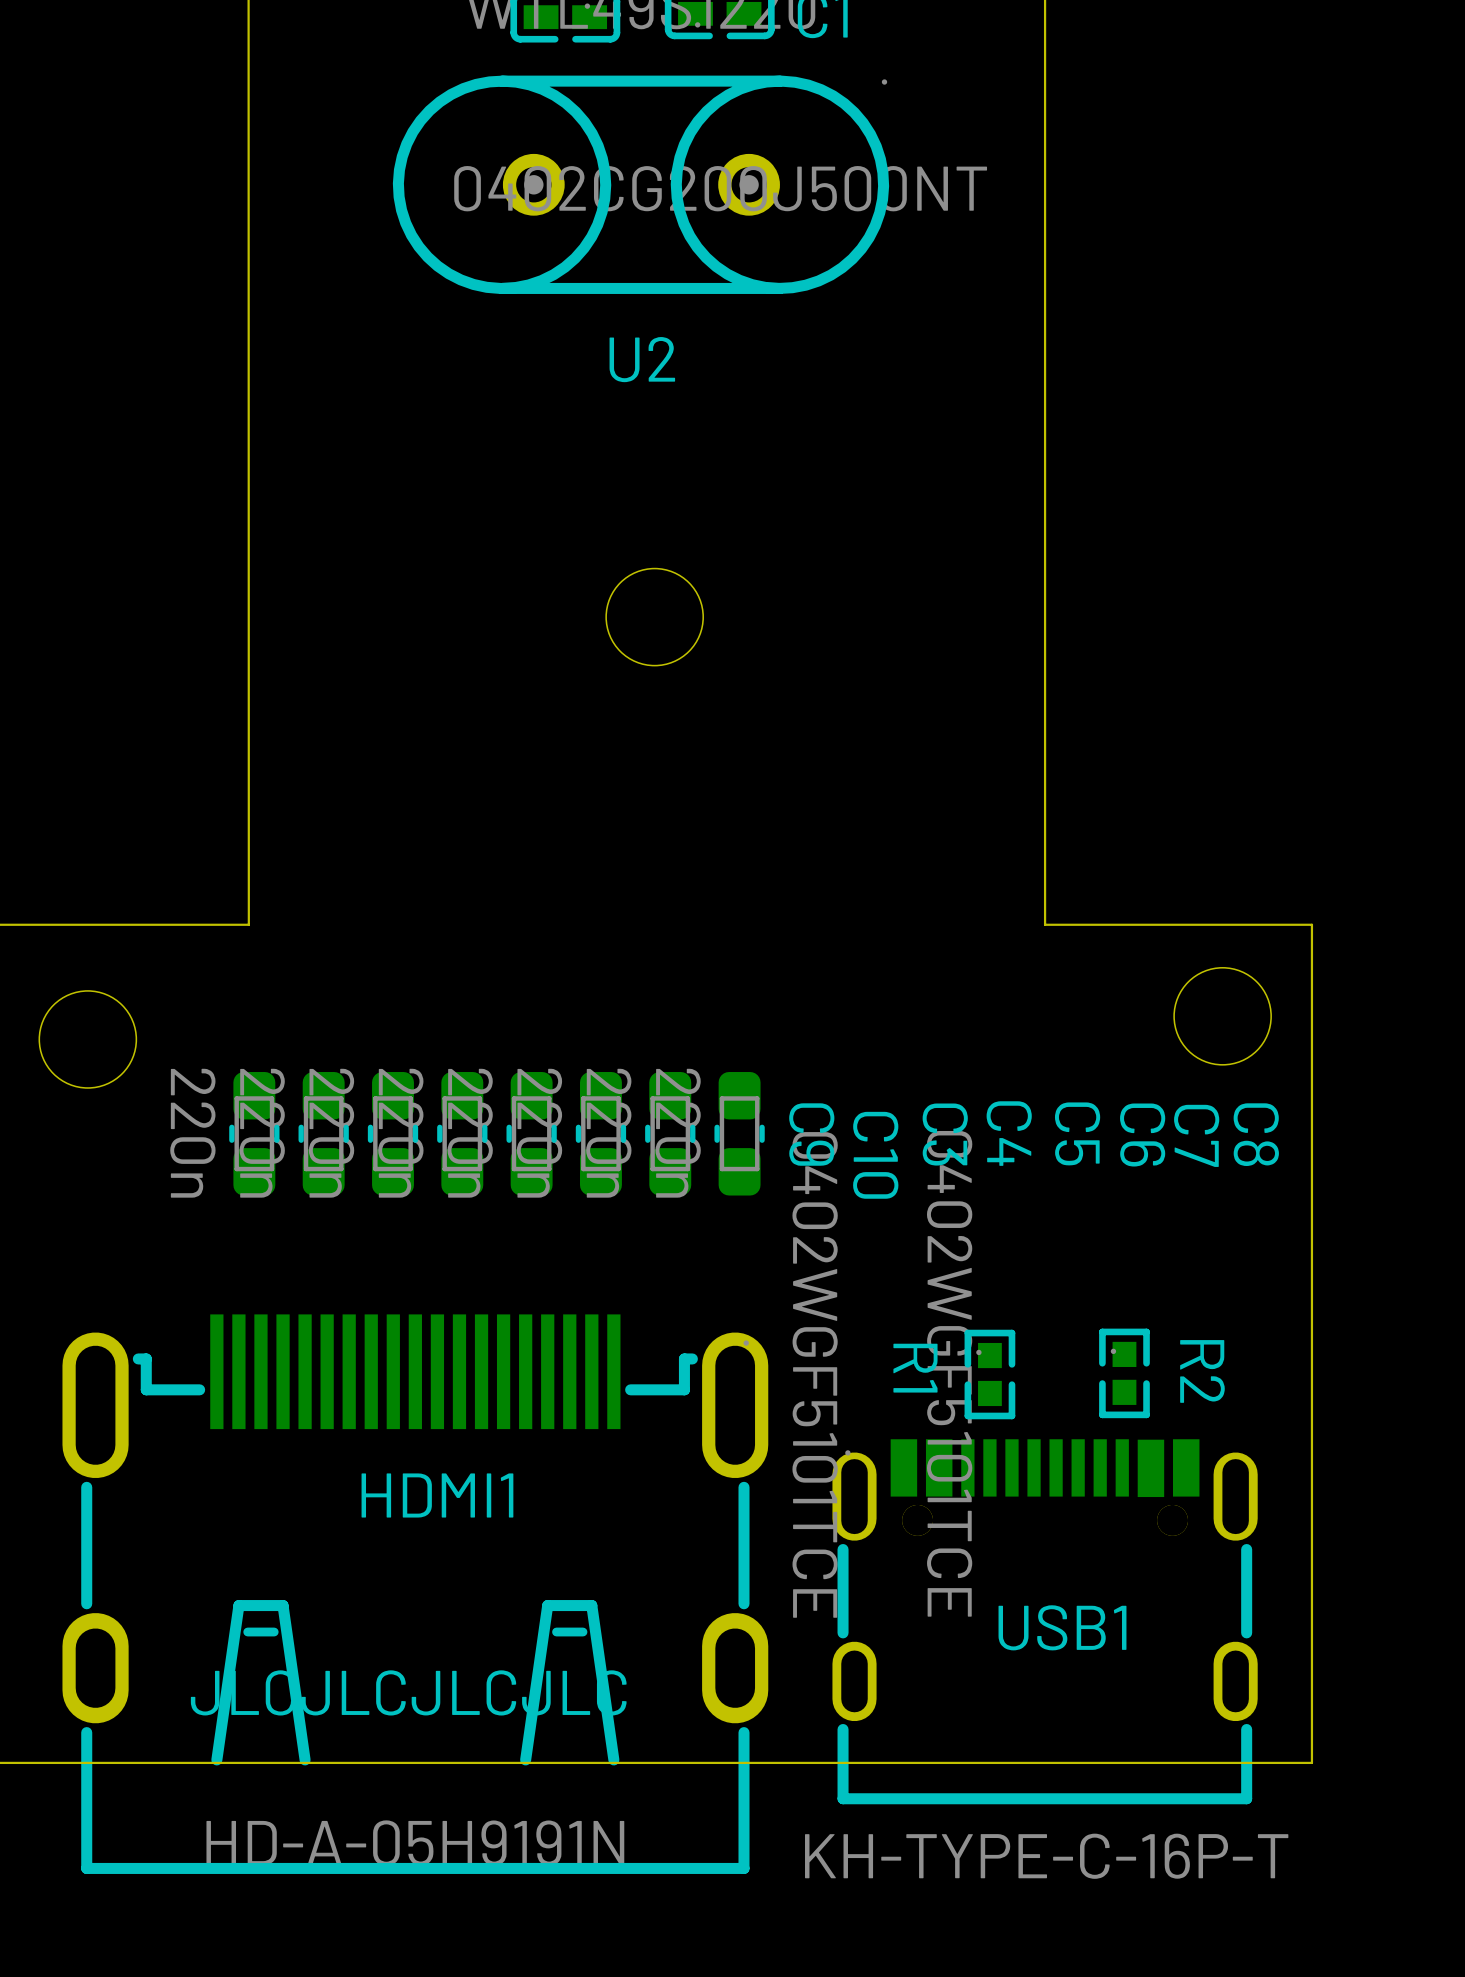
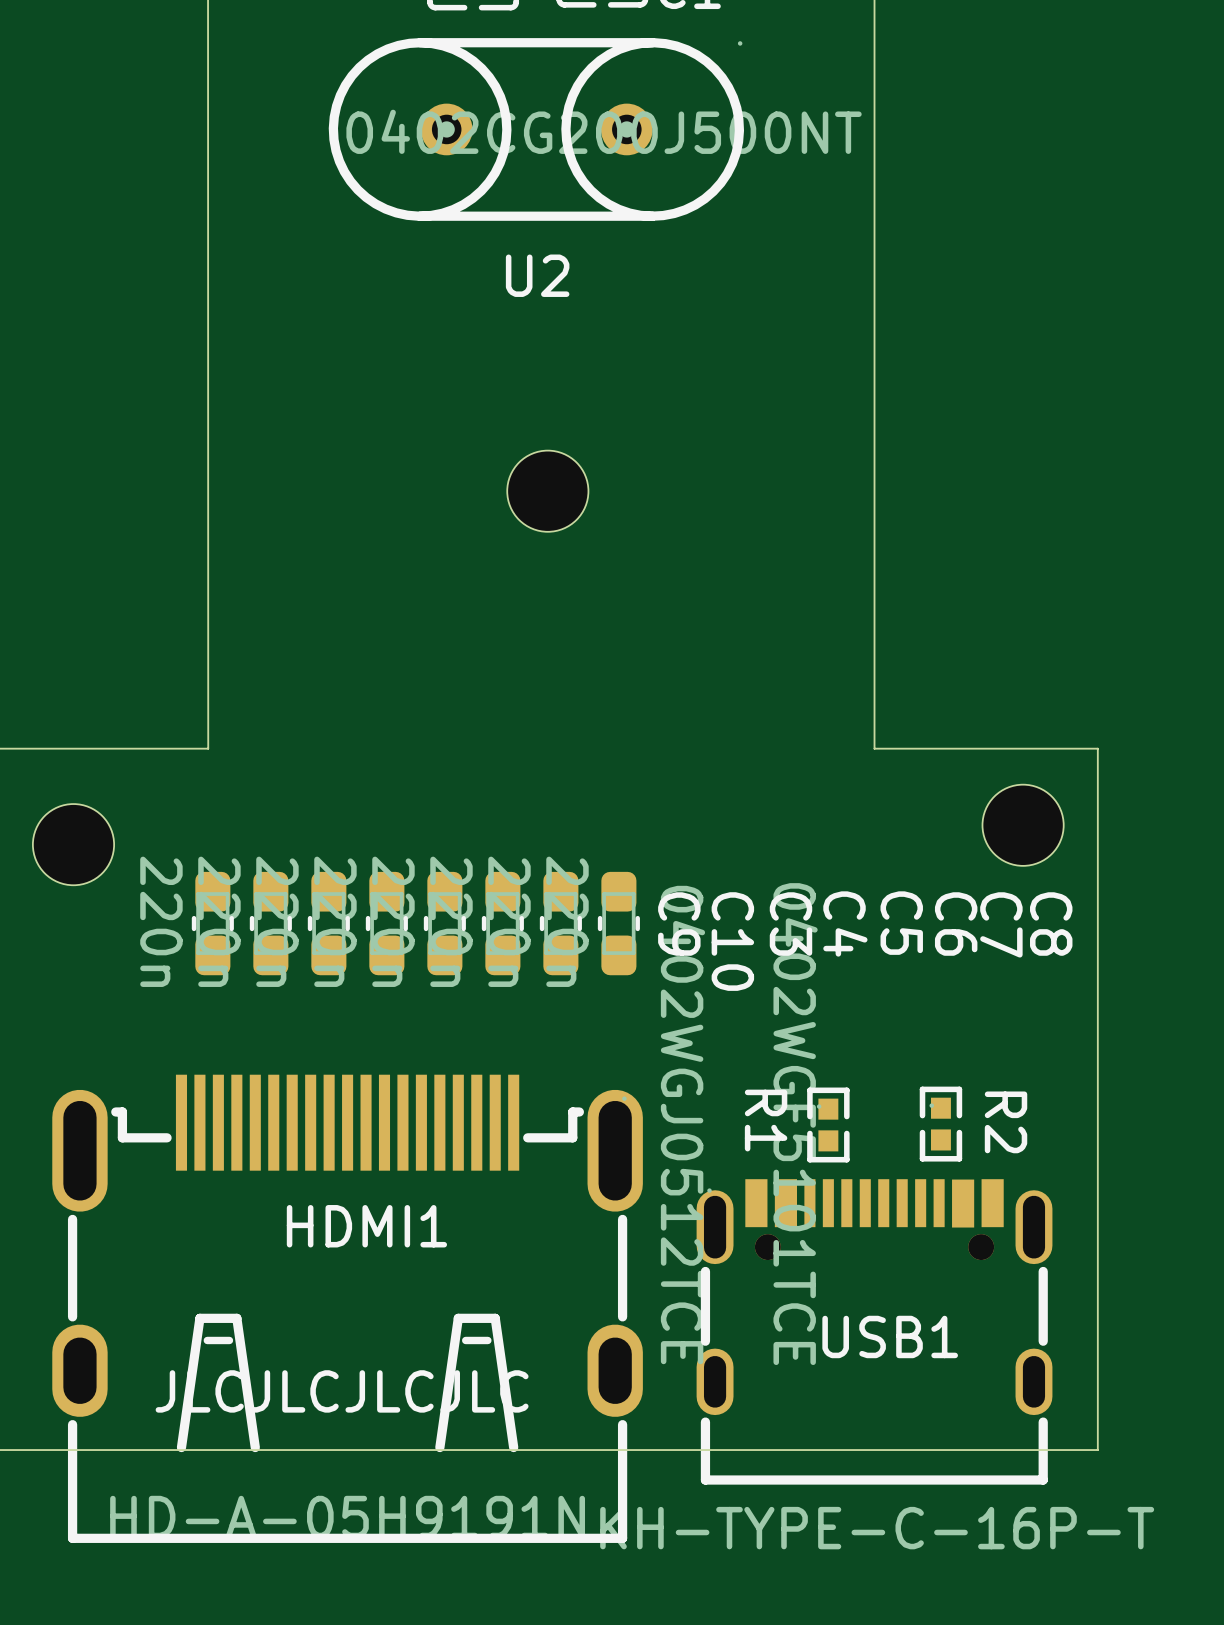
R1 value: 0402WGF5101TCE (815, 1374) -> 0402WGJ0512TCE (682, 1125)

